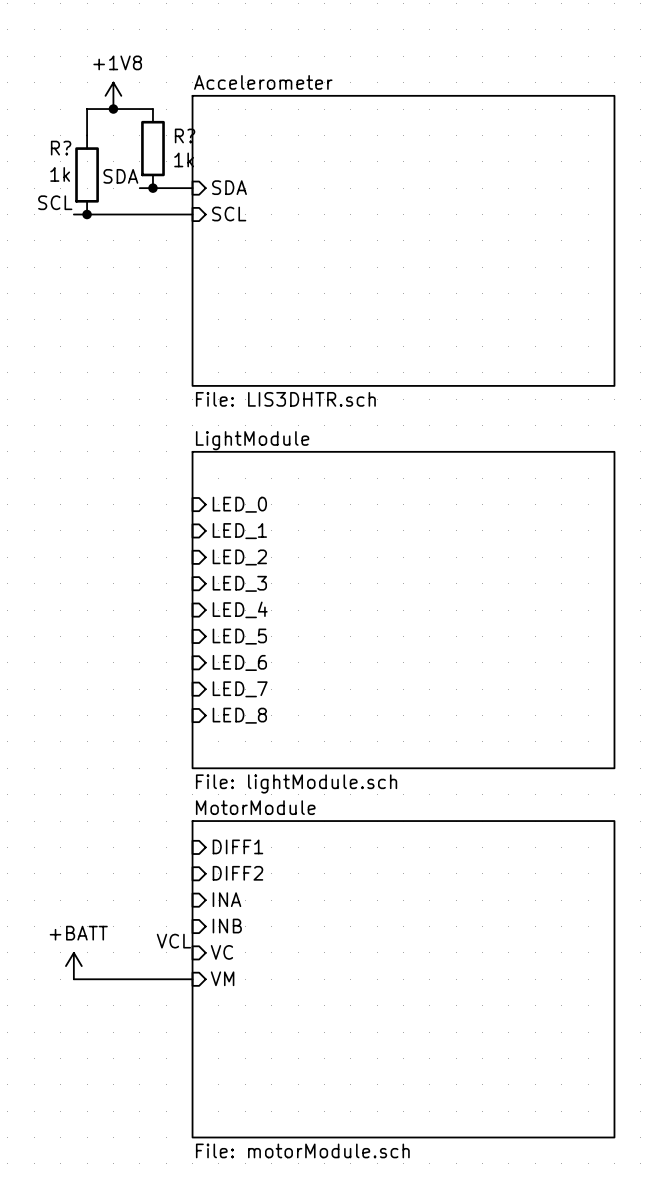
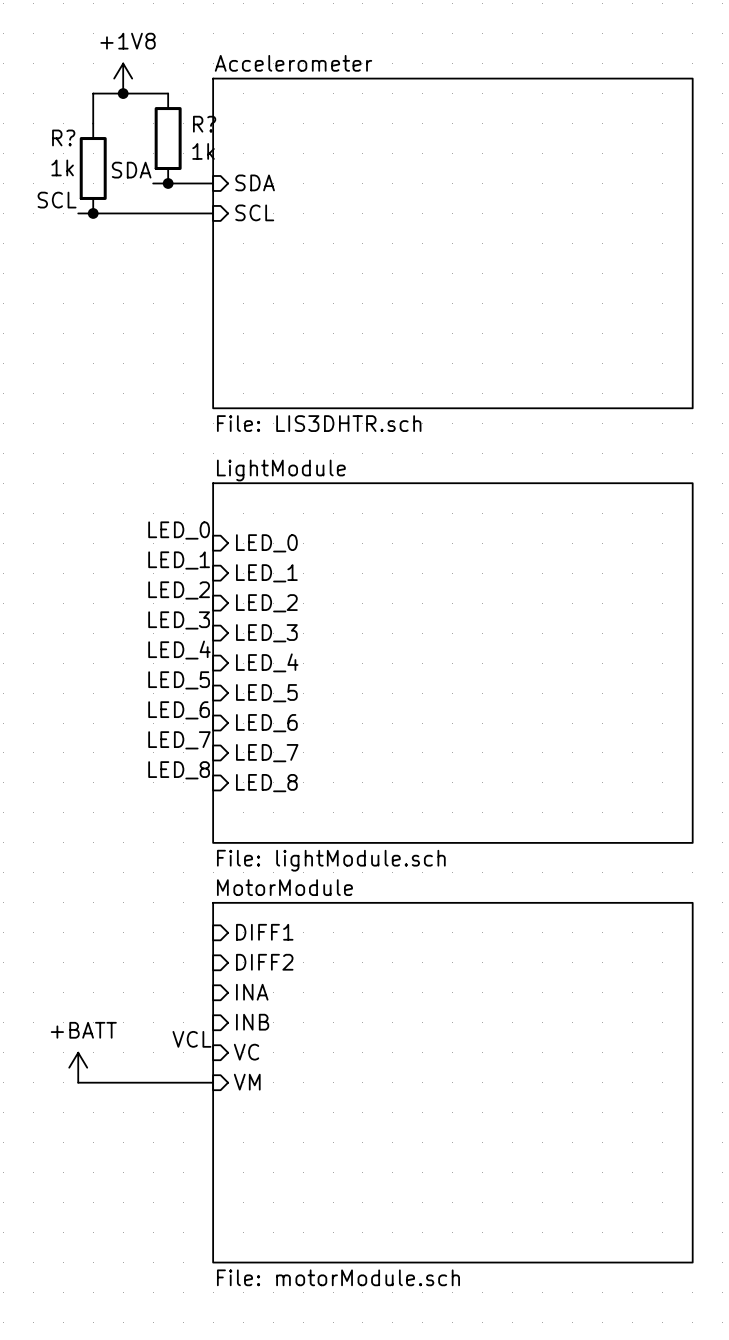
label: none -> LED_0 (179, 530)
label: none -> LED_1 (179, 560)
label: none -> LED_2 (179, 590)
label: none -> LED_3 (179, 620)
label: none -> LED_4 (179, 650)
label: none -> LED_5 (179, 680)
label: none -> LED_6 (179, 710)
label: none -> LED_7 (179, 740)
label: none -> LED_8 (179, 770)

